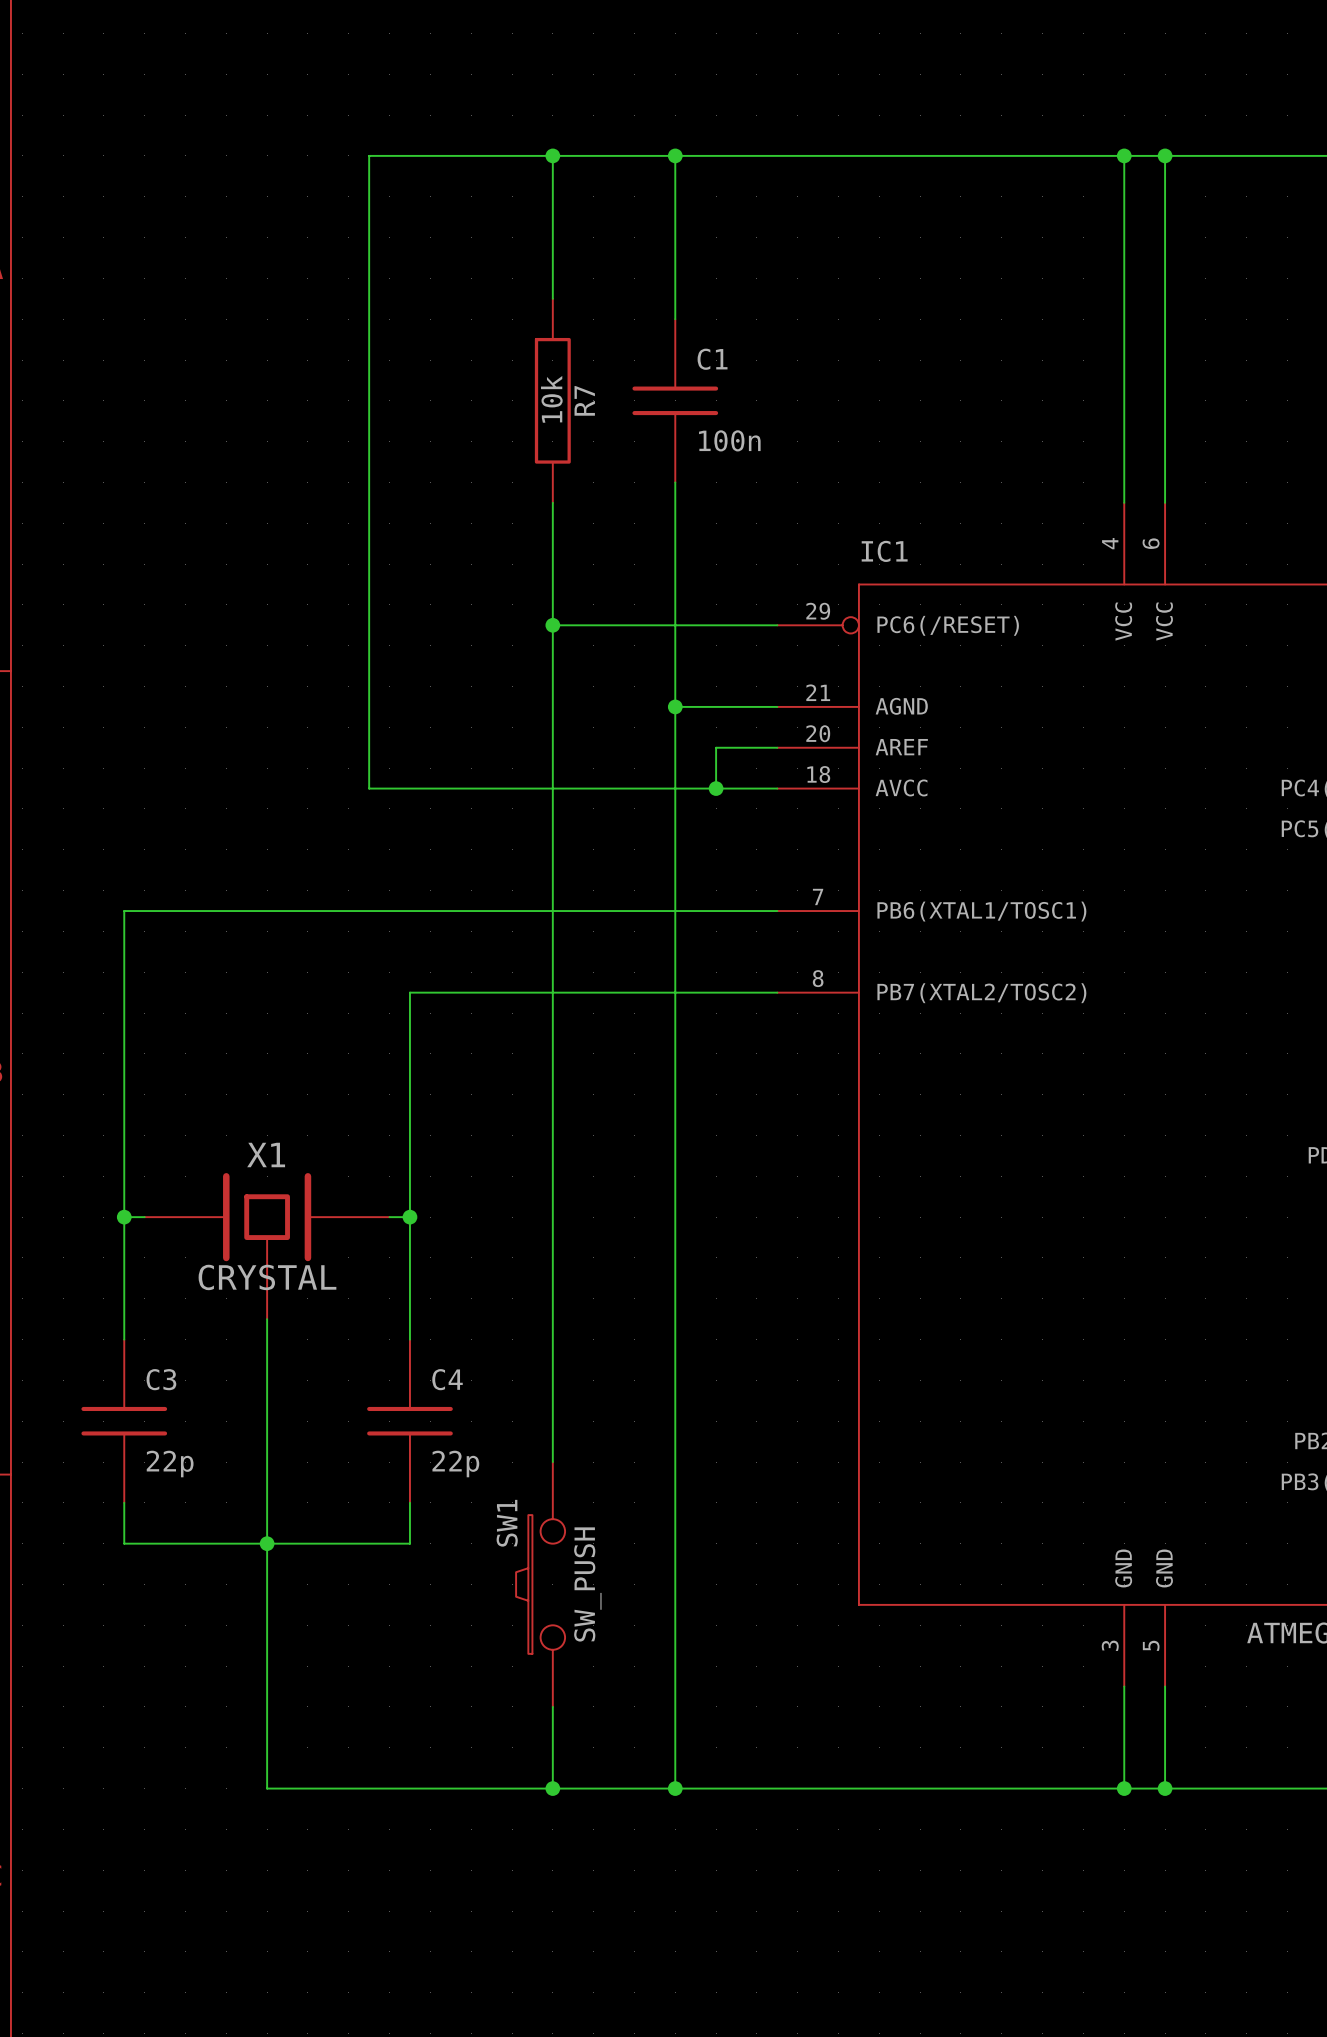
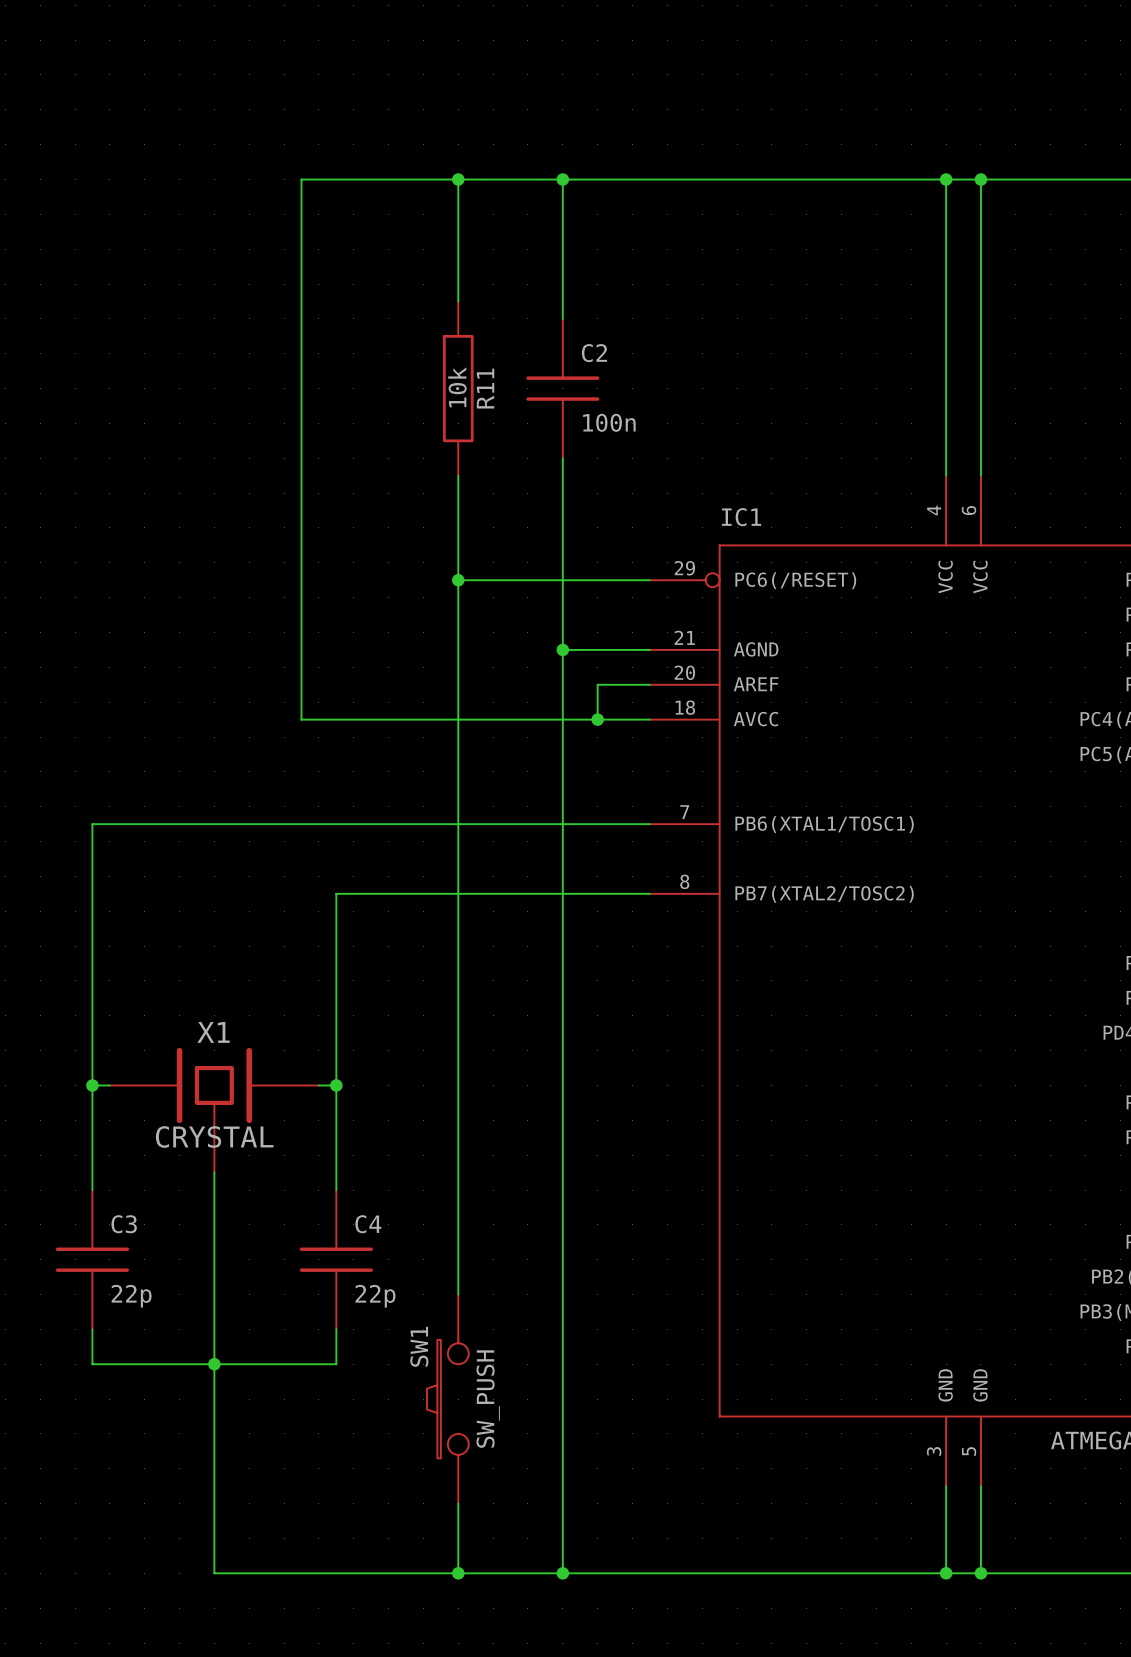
C1 name: C1 (712, 359) -> C2 (594, 353)
R7 name: R7 (584, 400) -> R11 (485, 388)

